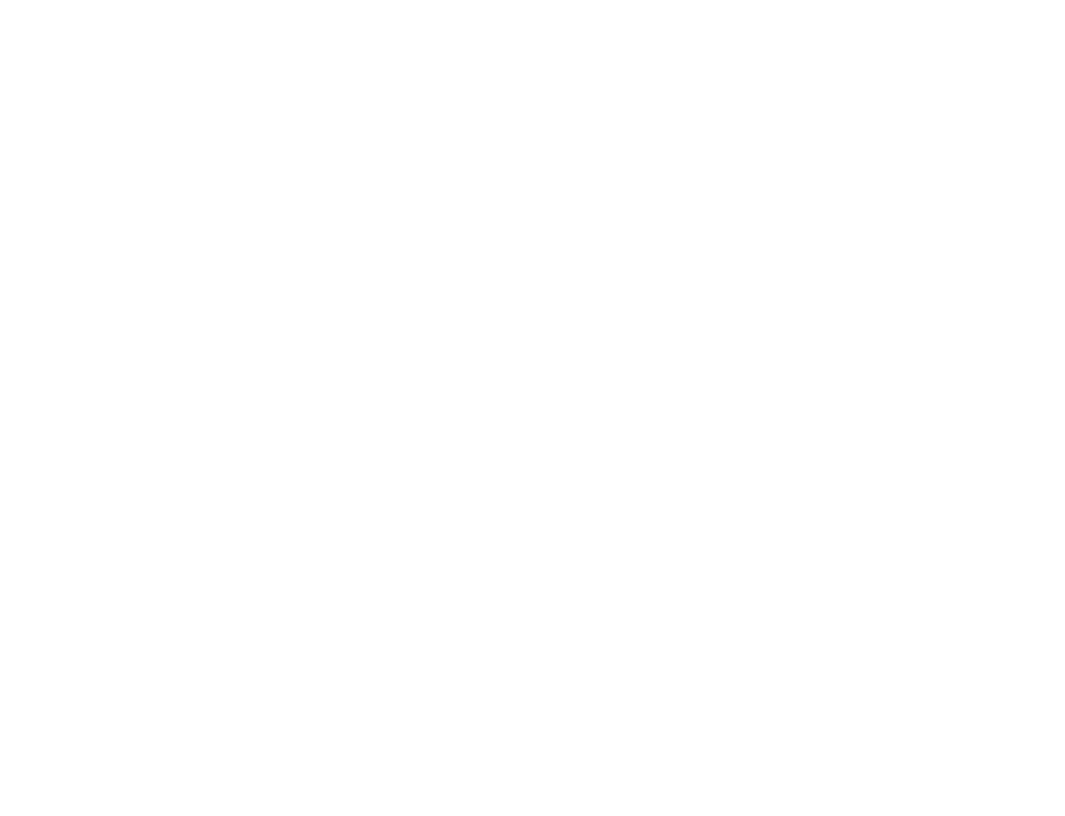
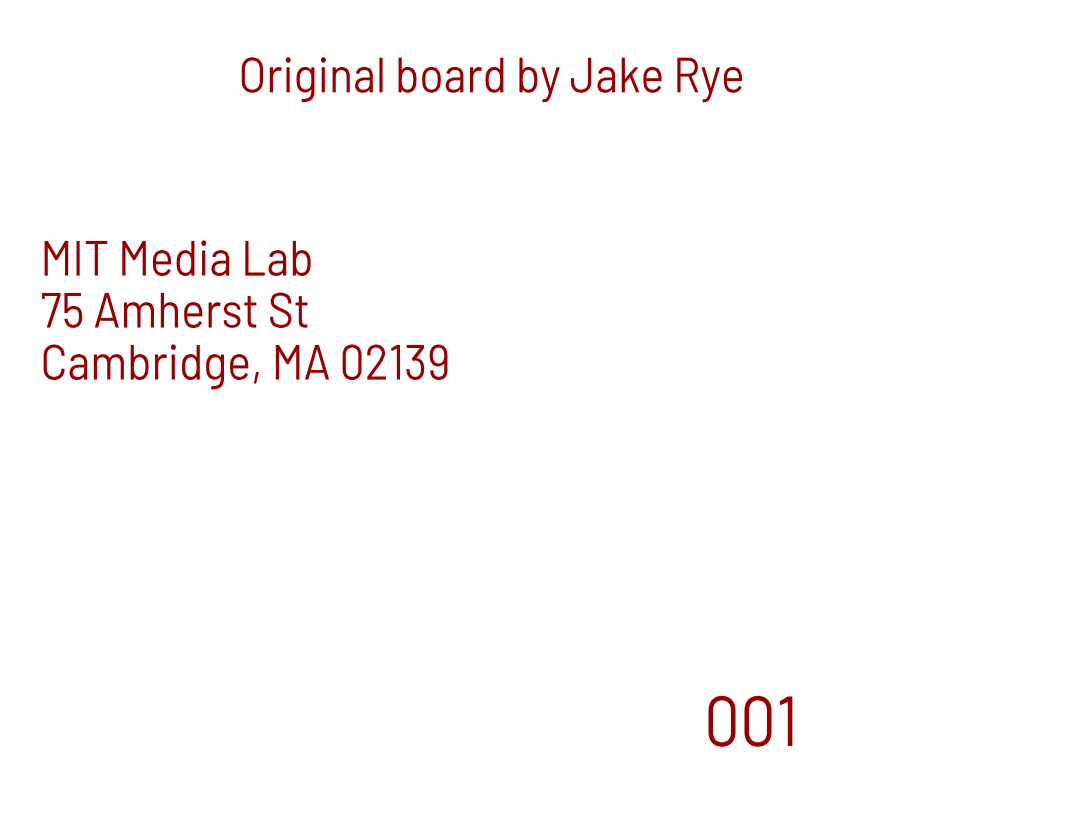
text: none -> Original board by Jake Rye (491, 79)
text: none -> MIT Media Lab (177, 258)
text: none -> 75 Amherst St (174, 310)
text: none -> Cambridge, MA 02139 (245, 366)
text: none -> 001 (750, 721)

